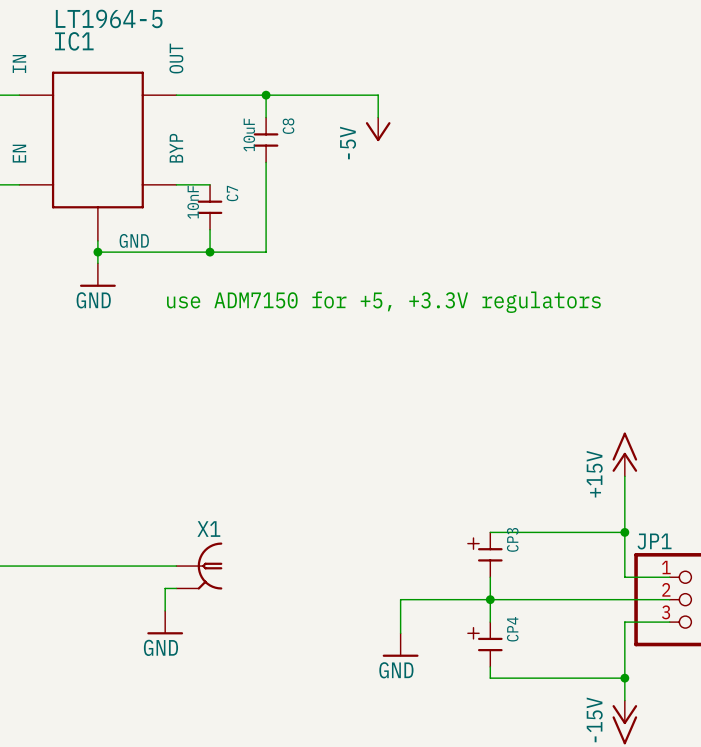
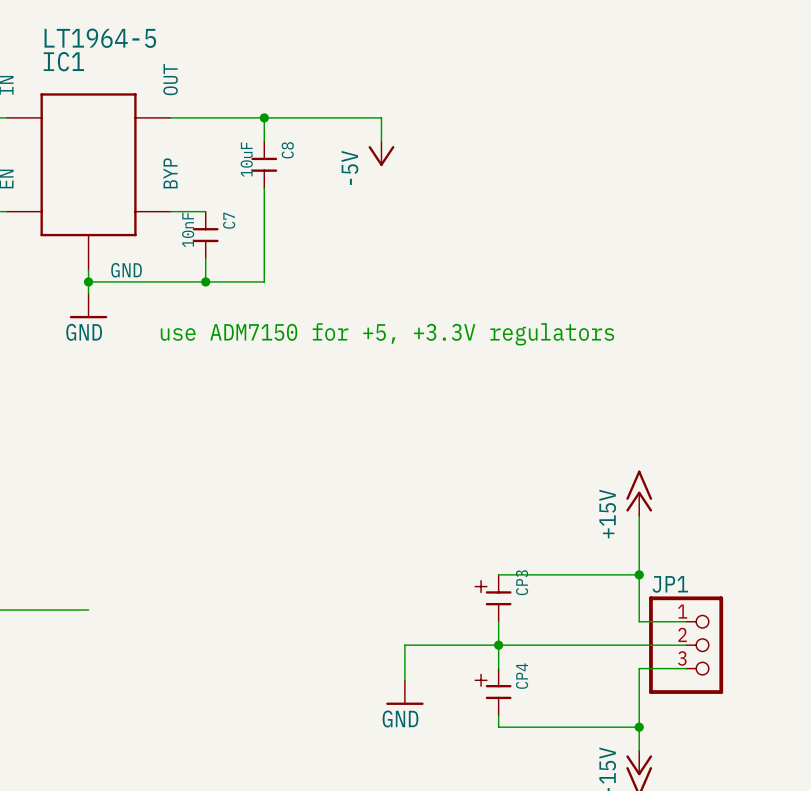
wire: (97, 566) (176, 566) -> none
X1: (199, 566) -> none
wire: (176, 588) (165, 588) (165, 610) -> none
power symbol: GND (165, 622) -> none

